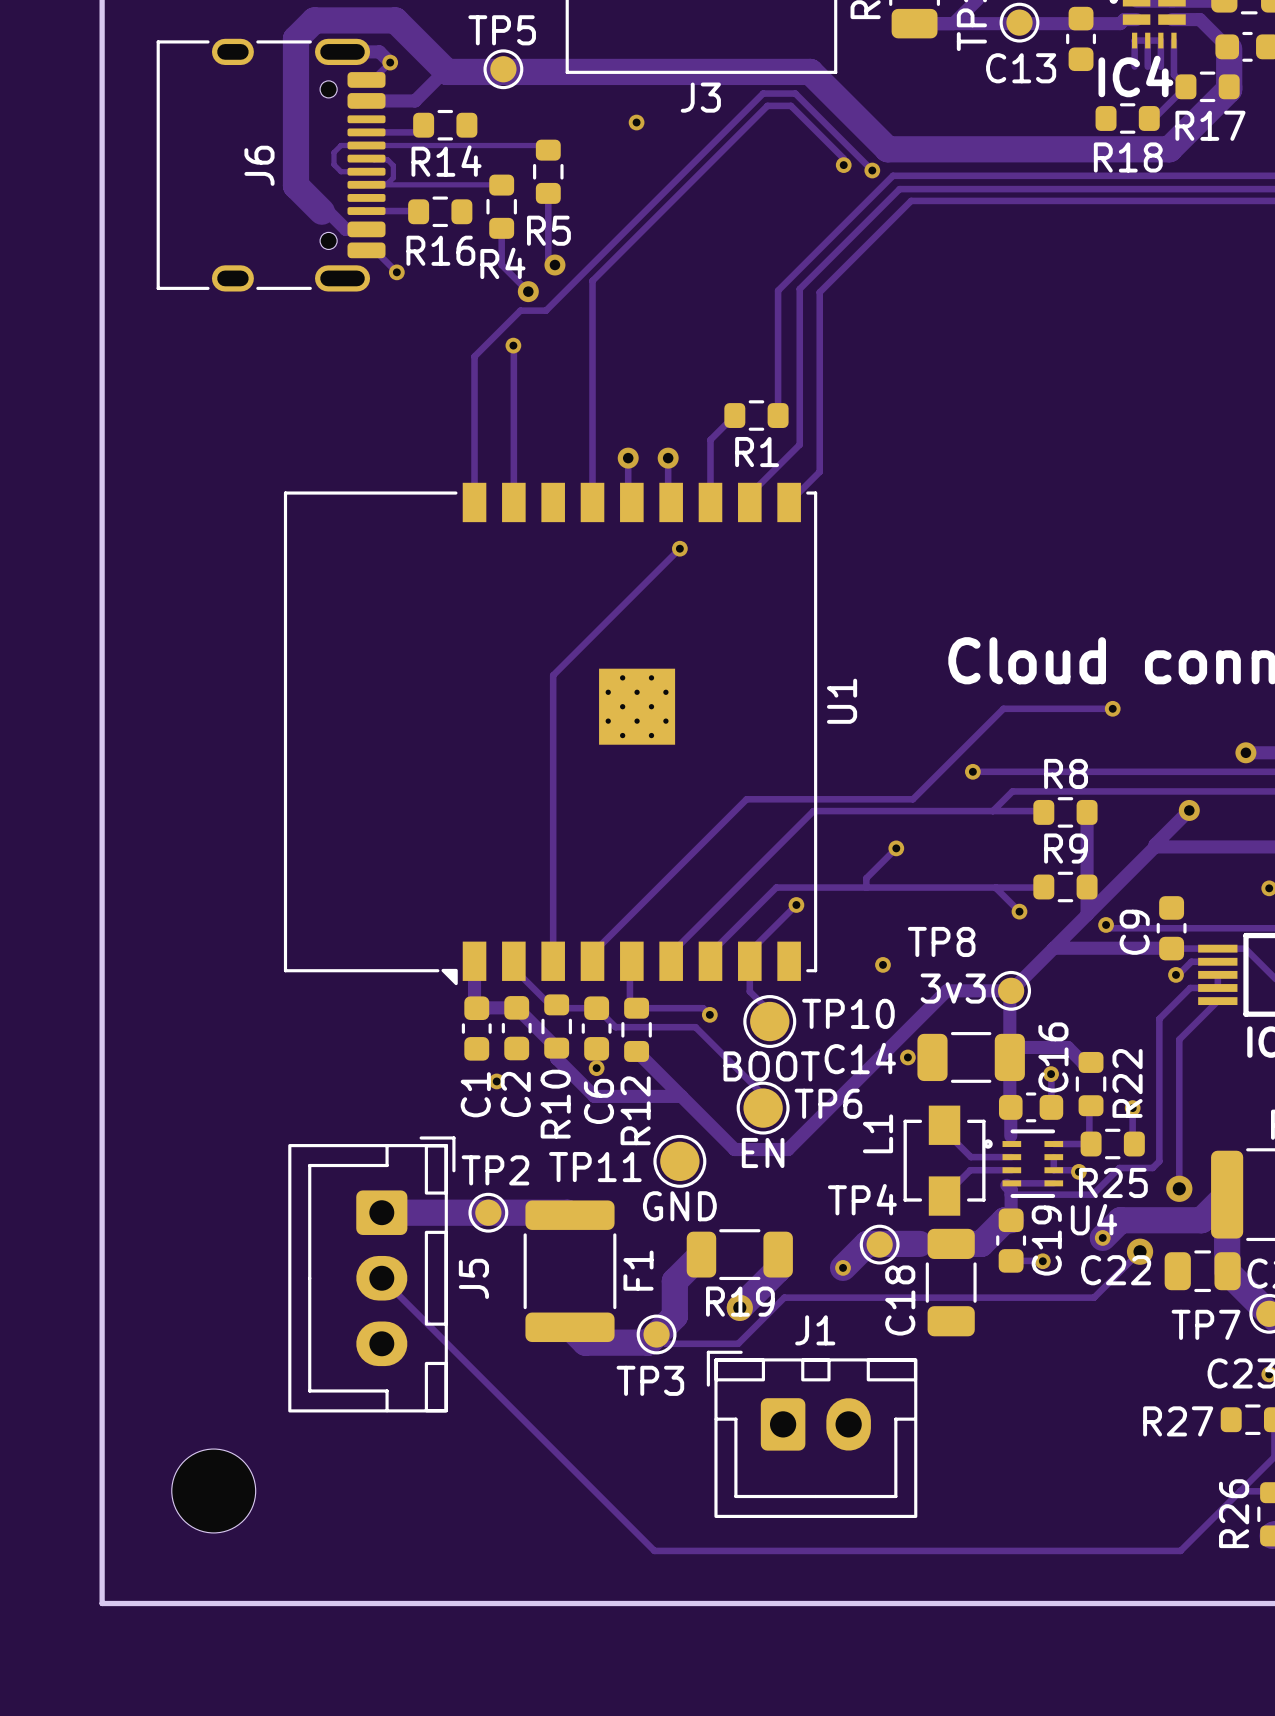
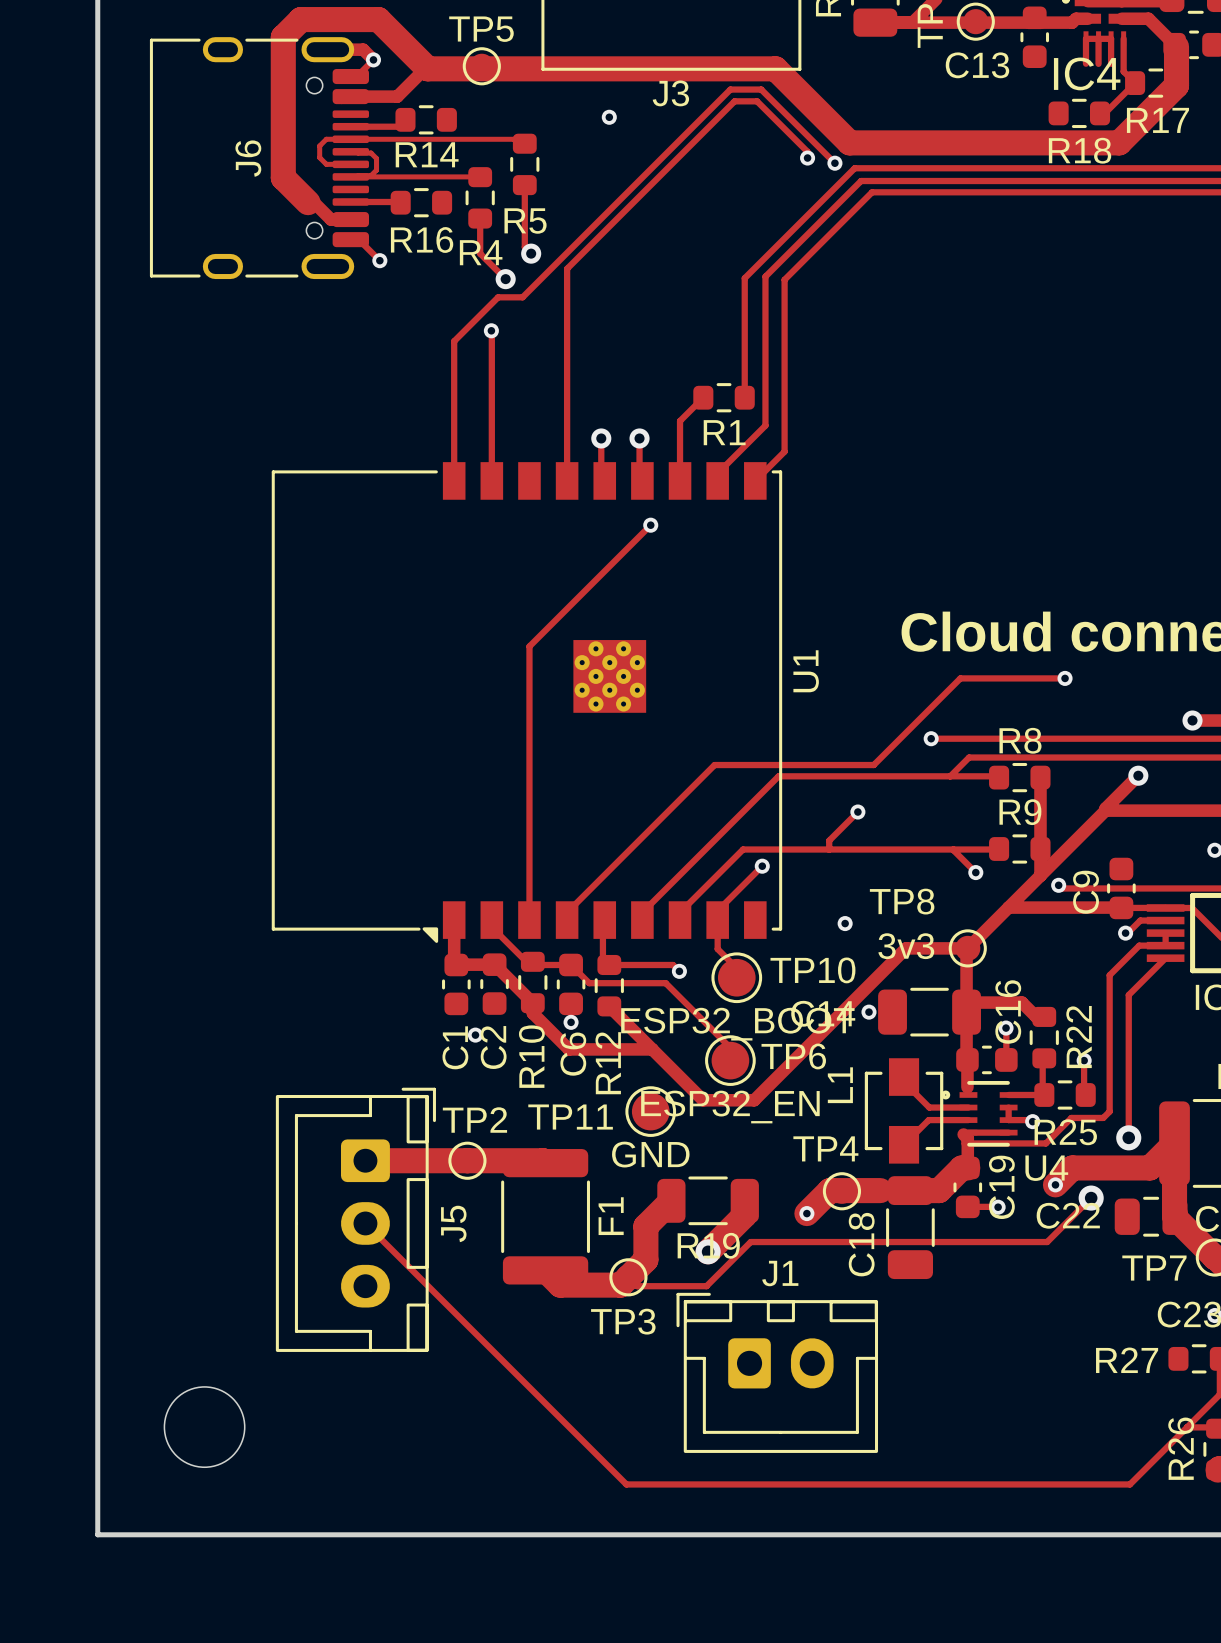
TP10 value: BOOT (771, 1066) -> ESP32_BOOT (737, 1024)
TP6 value: EN (763, 1152) -> ESP32_EN (730, 1107)

